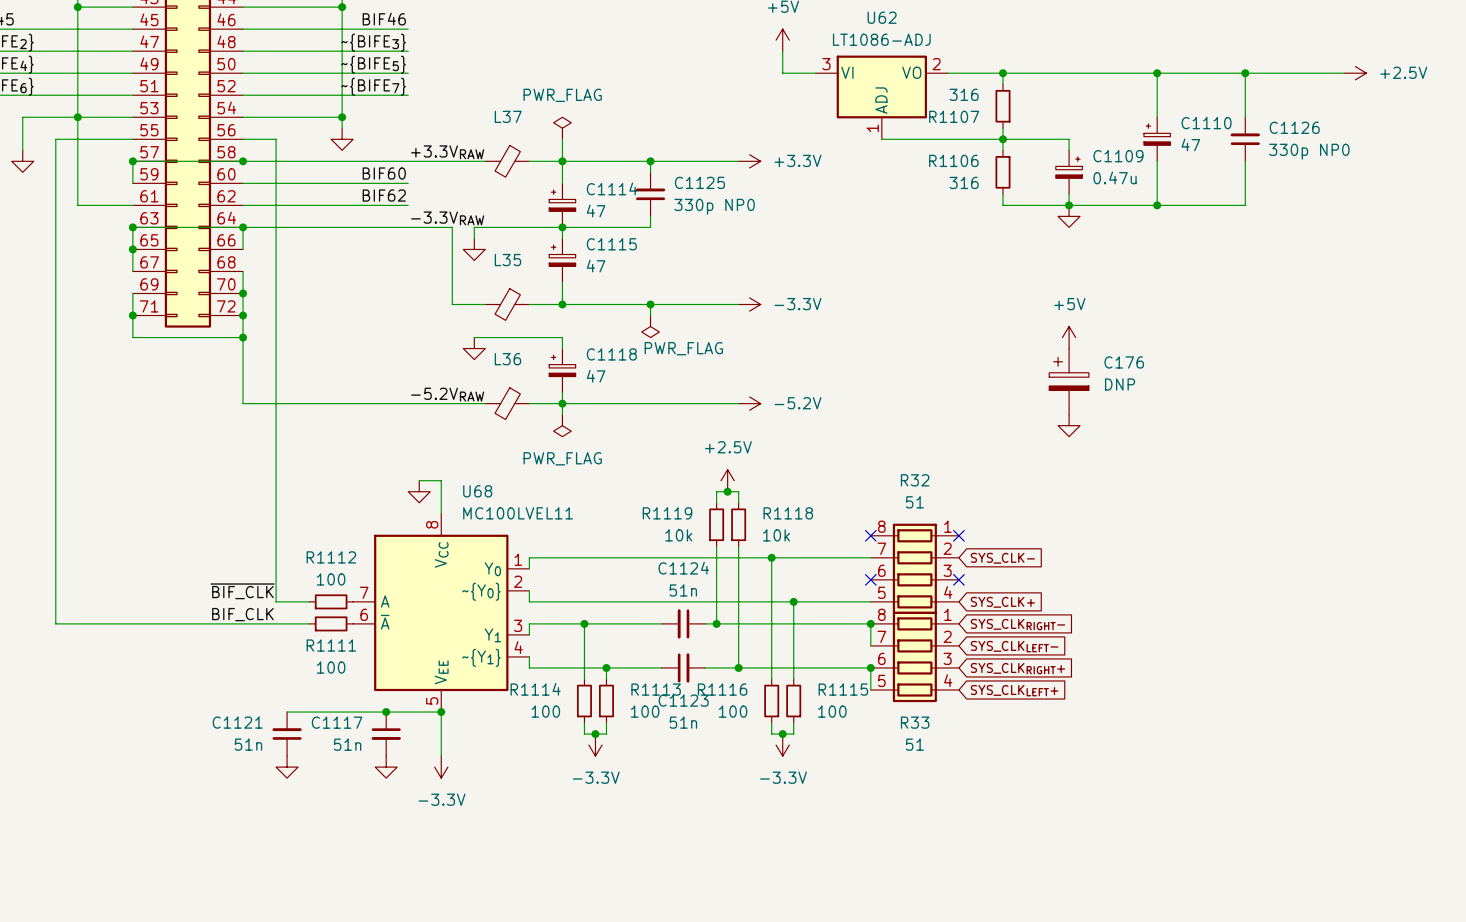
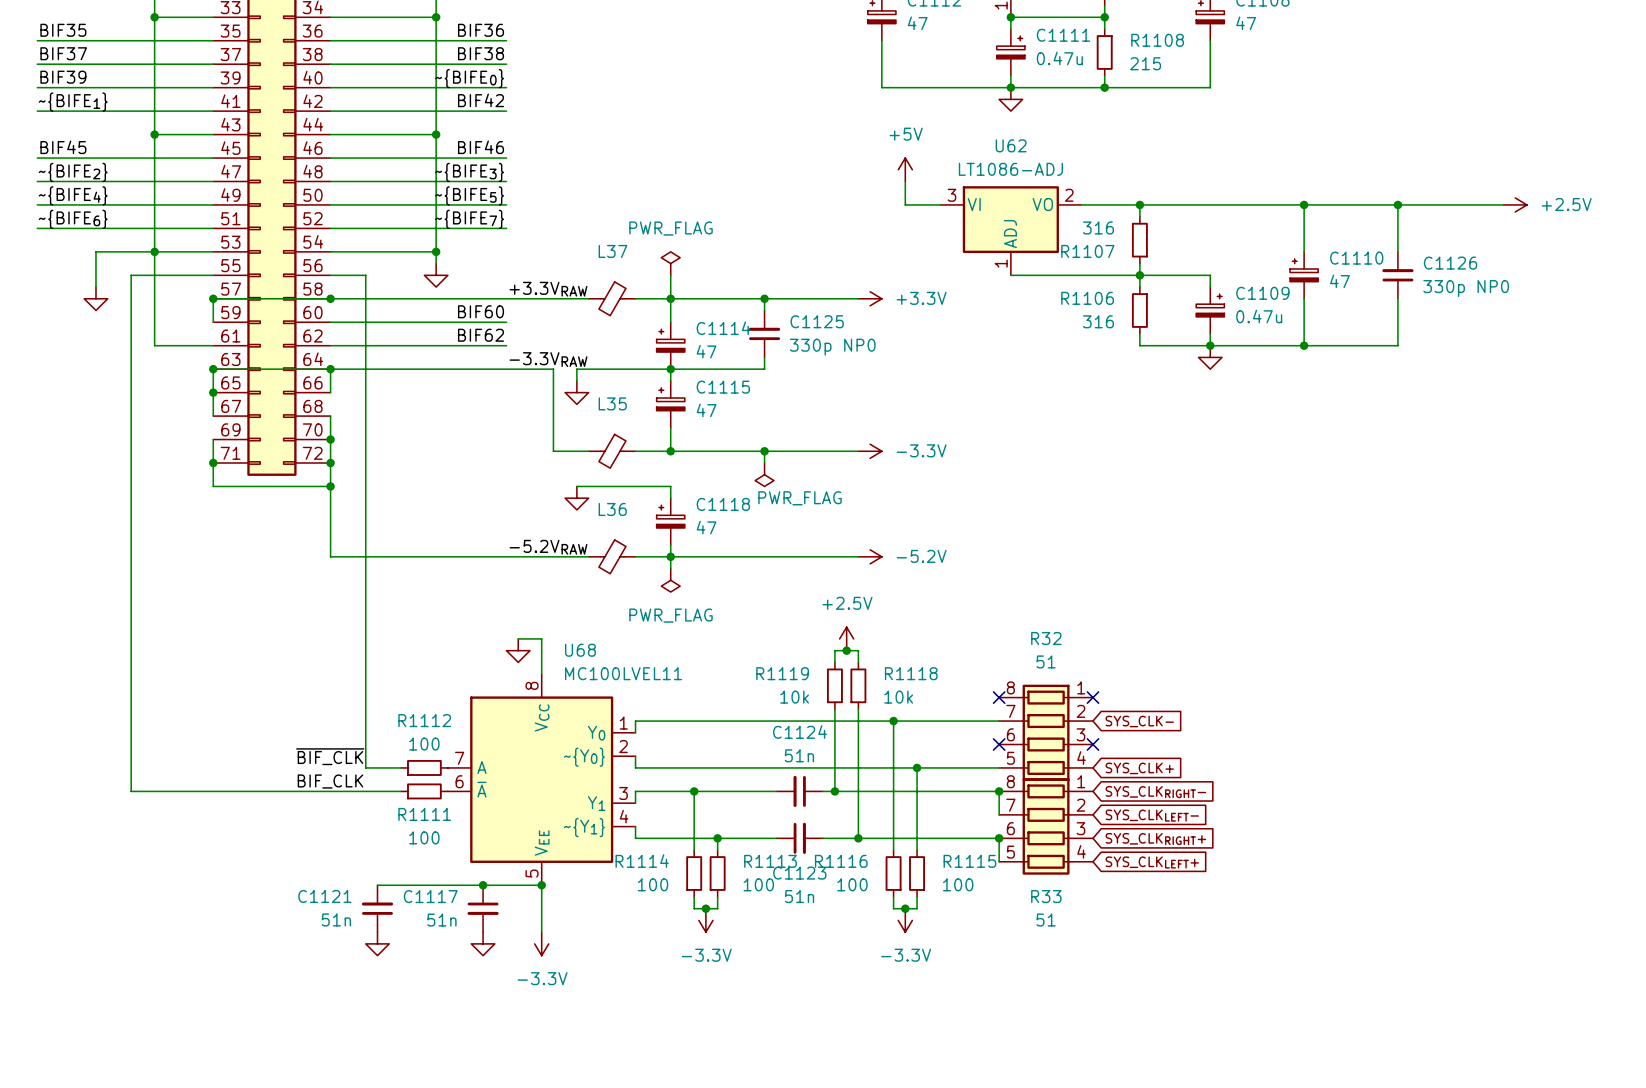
power symbol: +5V (1069, 337) -> none
C176: DNP (1069, 381) -> none
power symbol: (1069, 425) -> none

